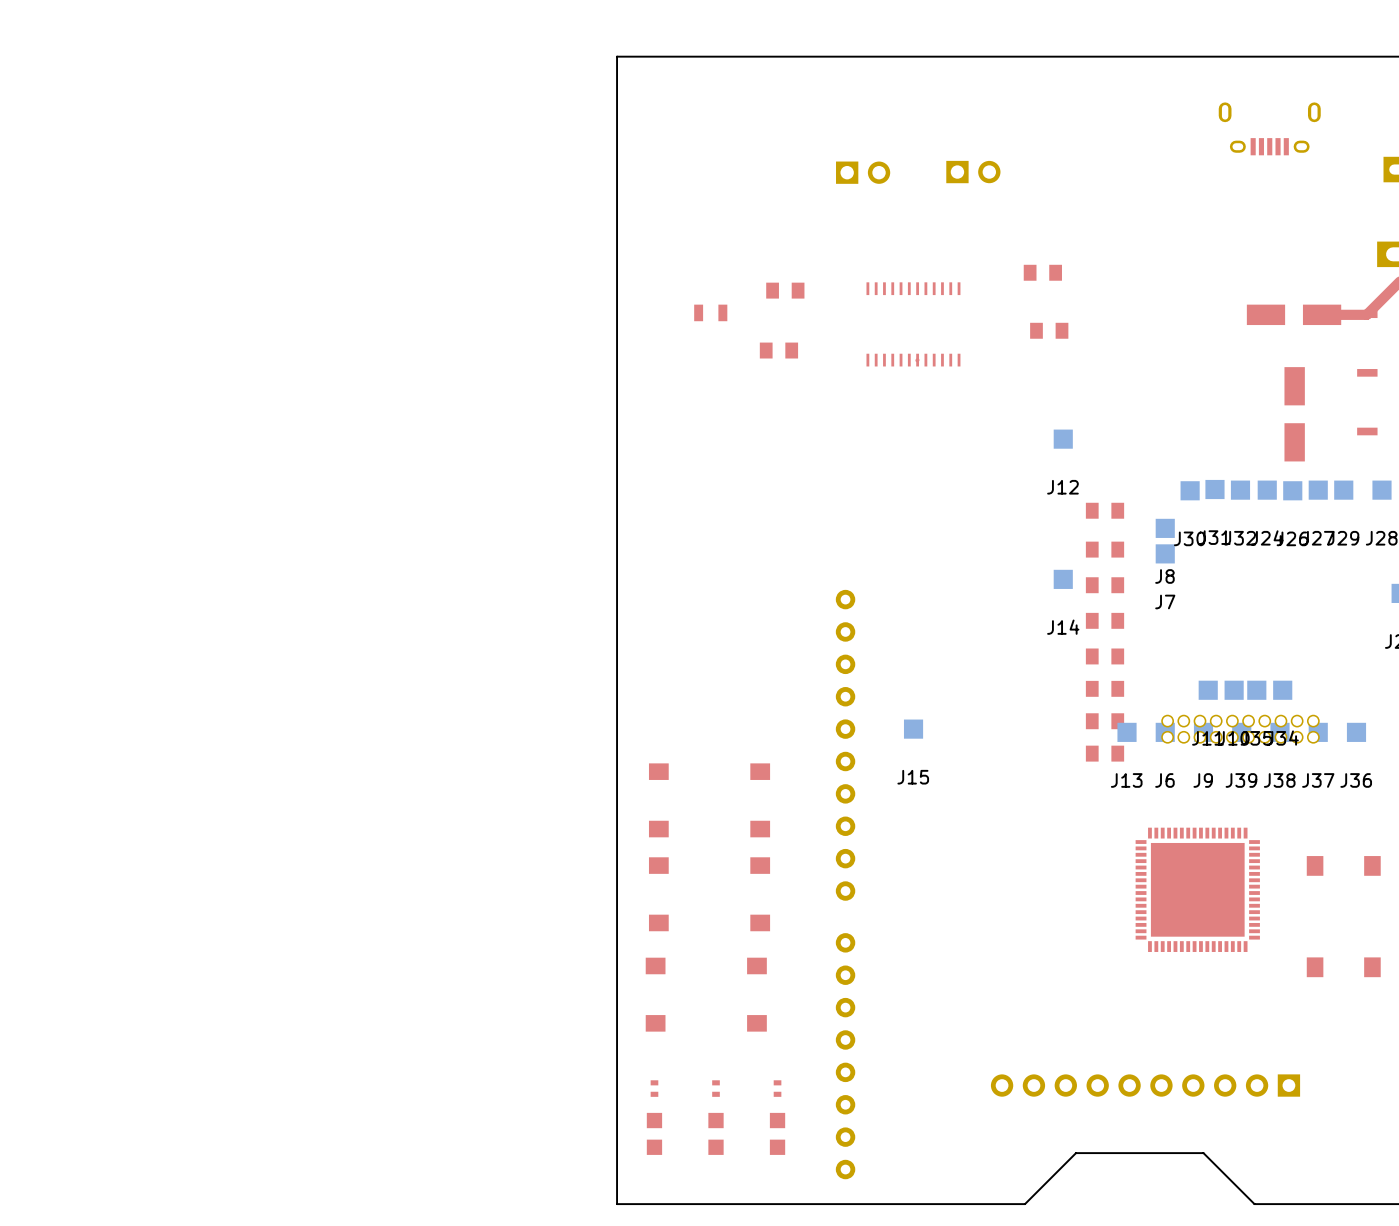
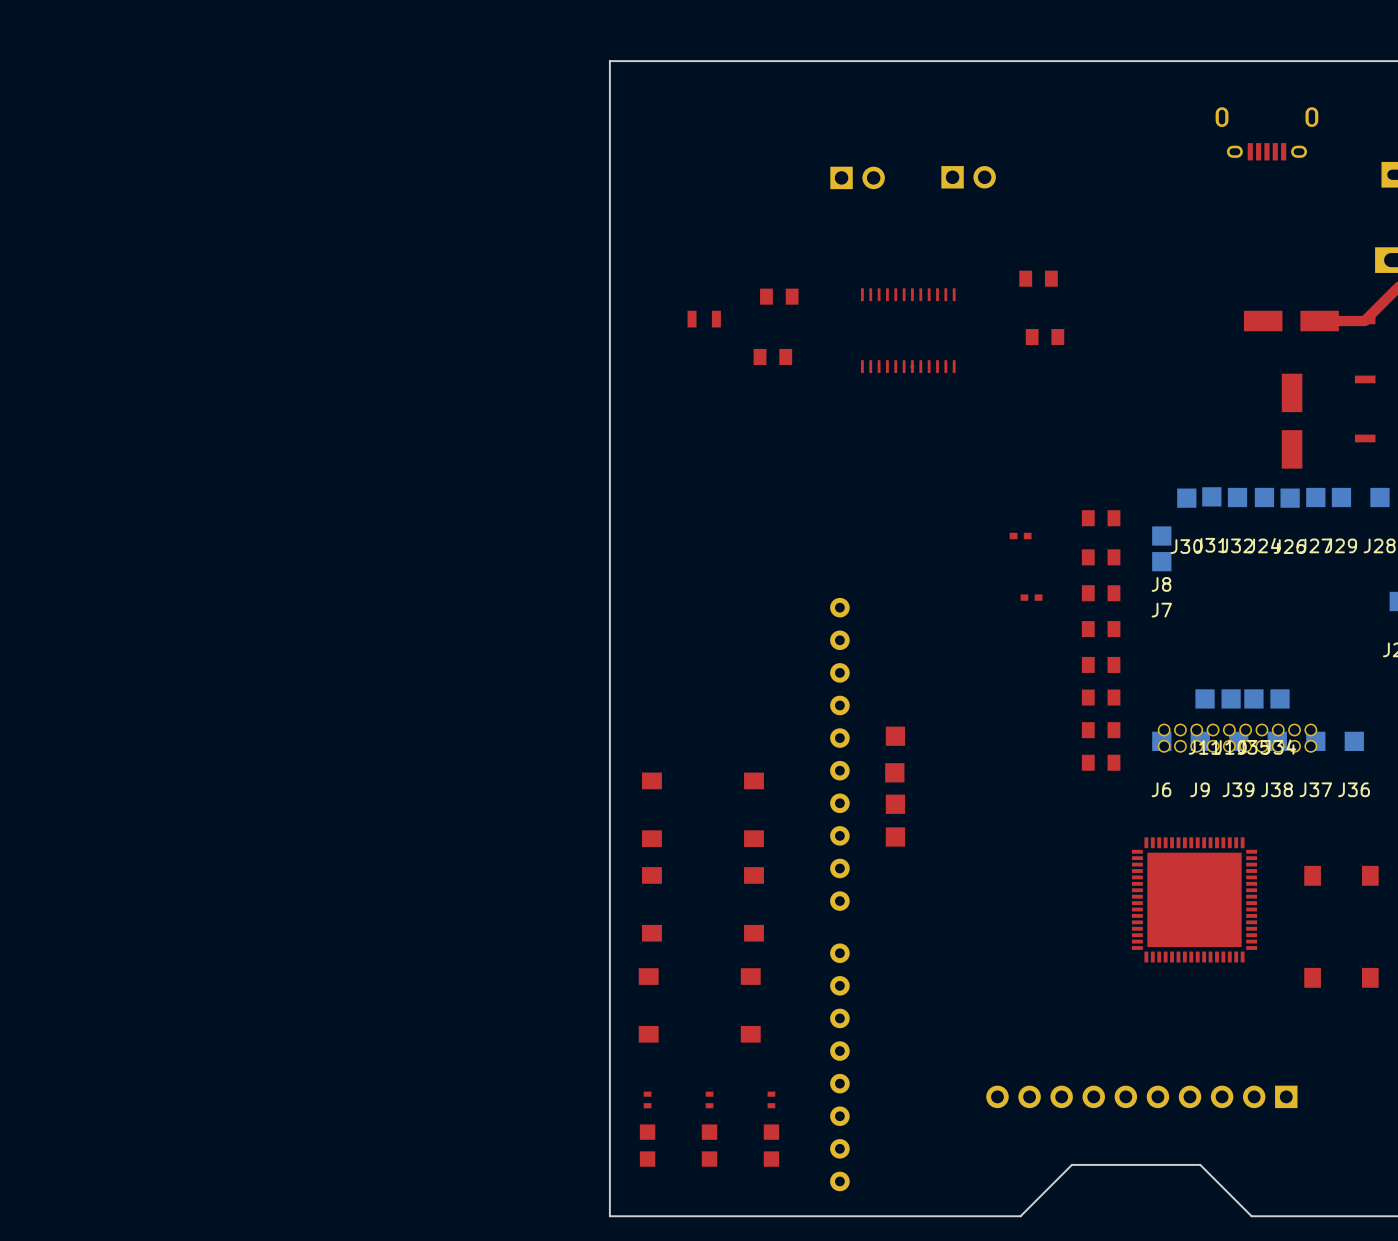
J12: (1063, 439) -> none
part: none -> (1020, 536)
J14 side: bottom (1063, 579) -> top (894, 772)
part: none -> (1031, 597)
J15 side: bottom (913, 729) -> top (895, 736)
J13 side: bottom (1127, 732) -> top (895, 804)
part: none -> (895, 836)

